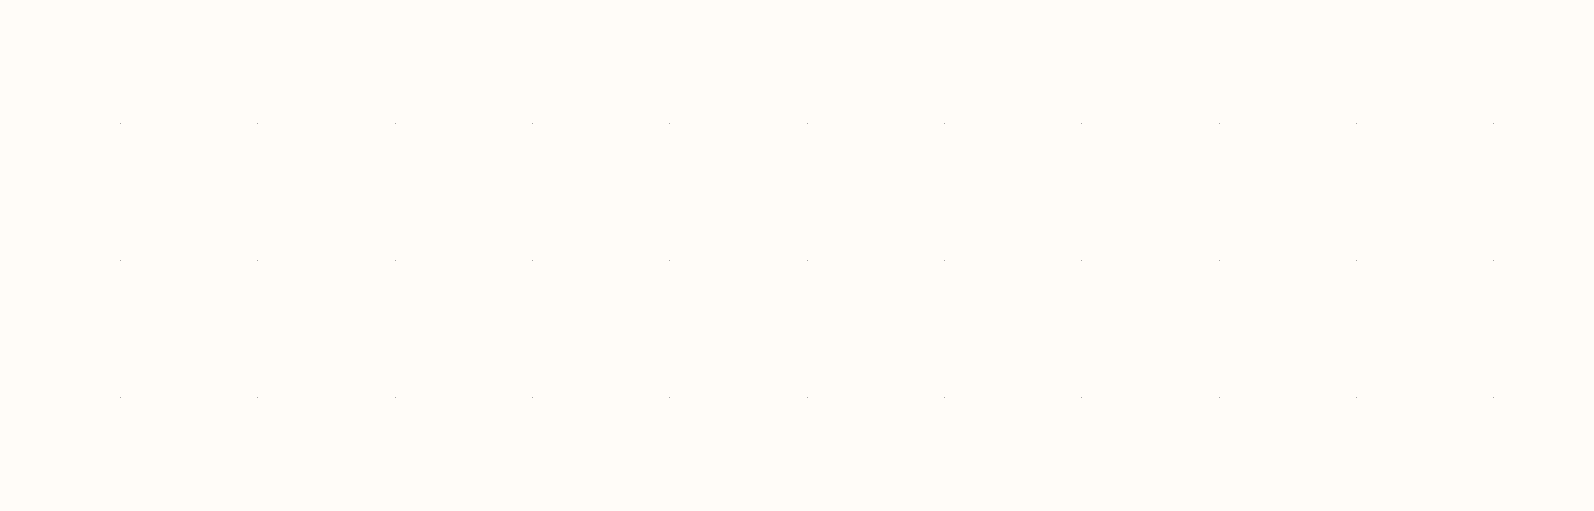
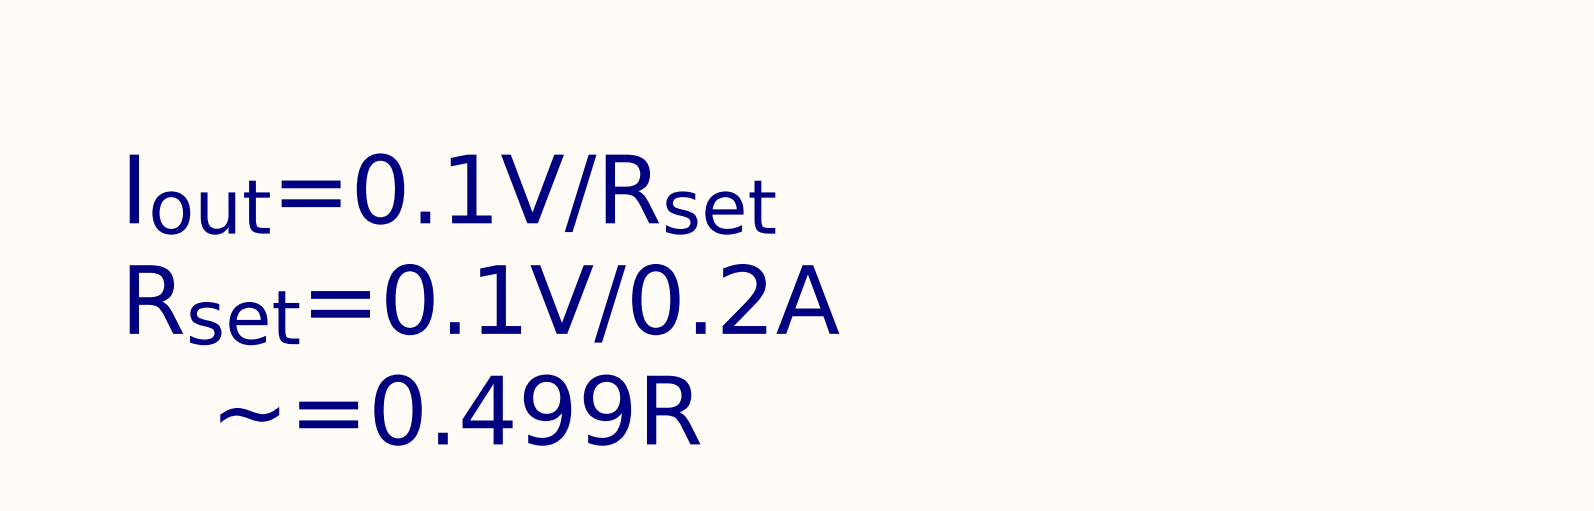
text: none -> Iout=0.1V/Rset (452, 194)
text: none -> Rset=0.1V/0.2A (484, 304)
text: none -> ~=0.499R (460, 410)

